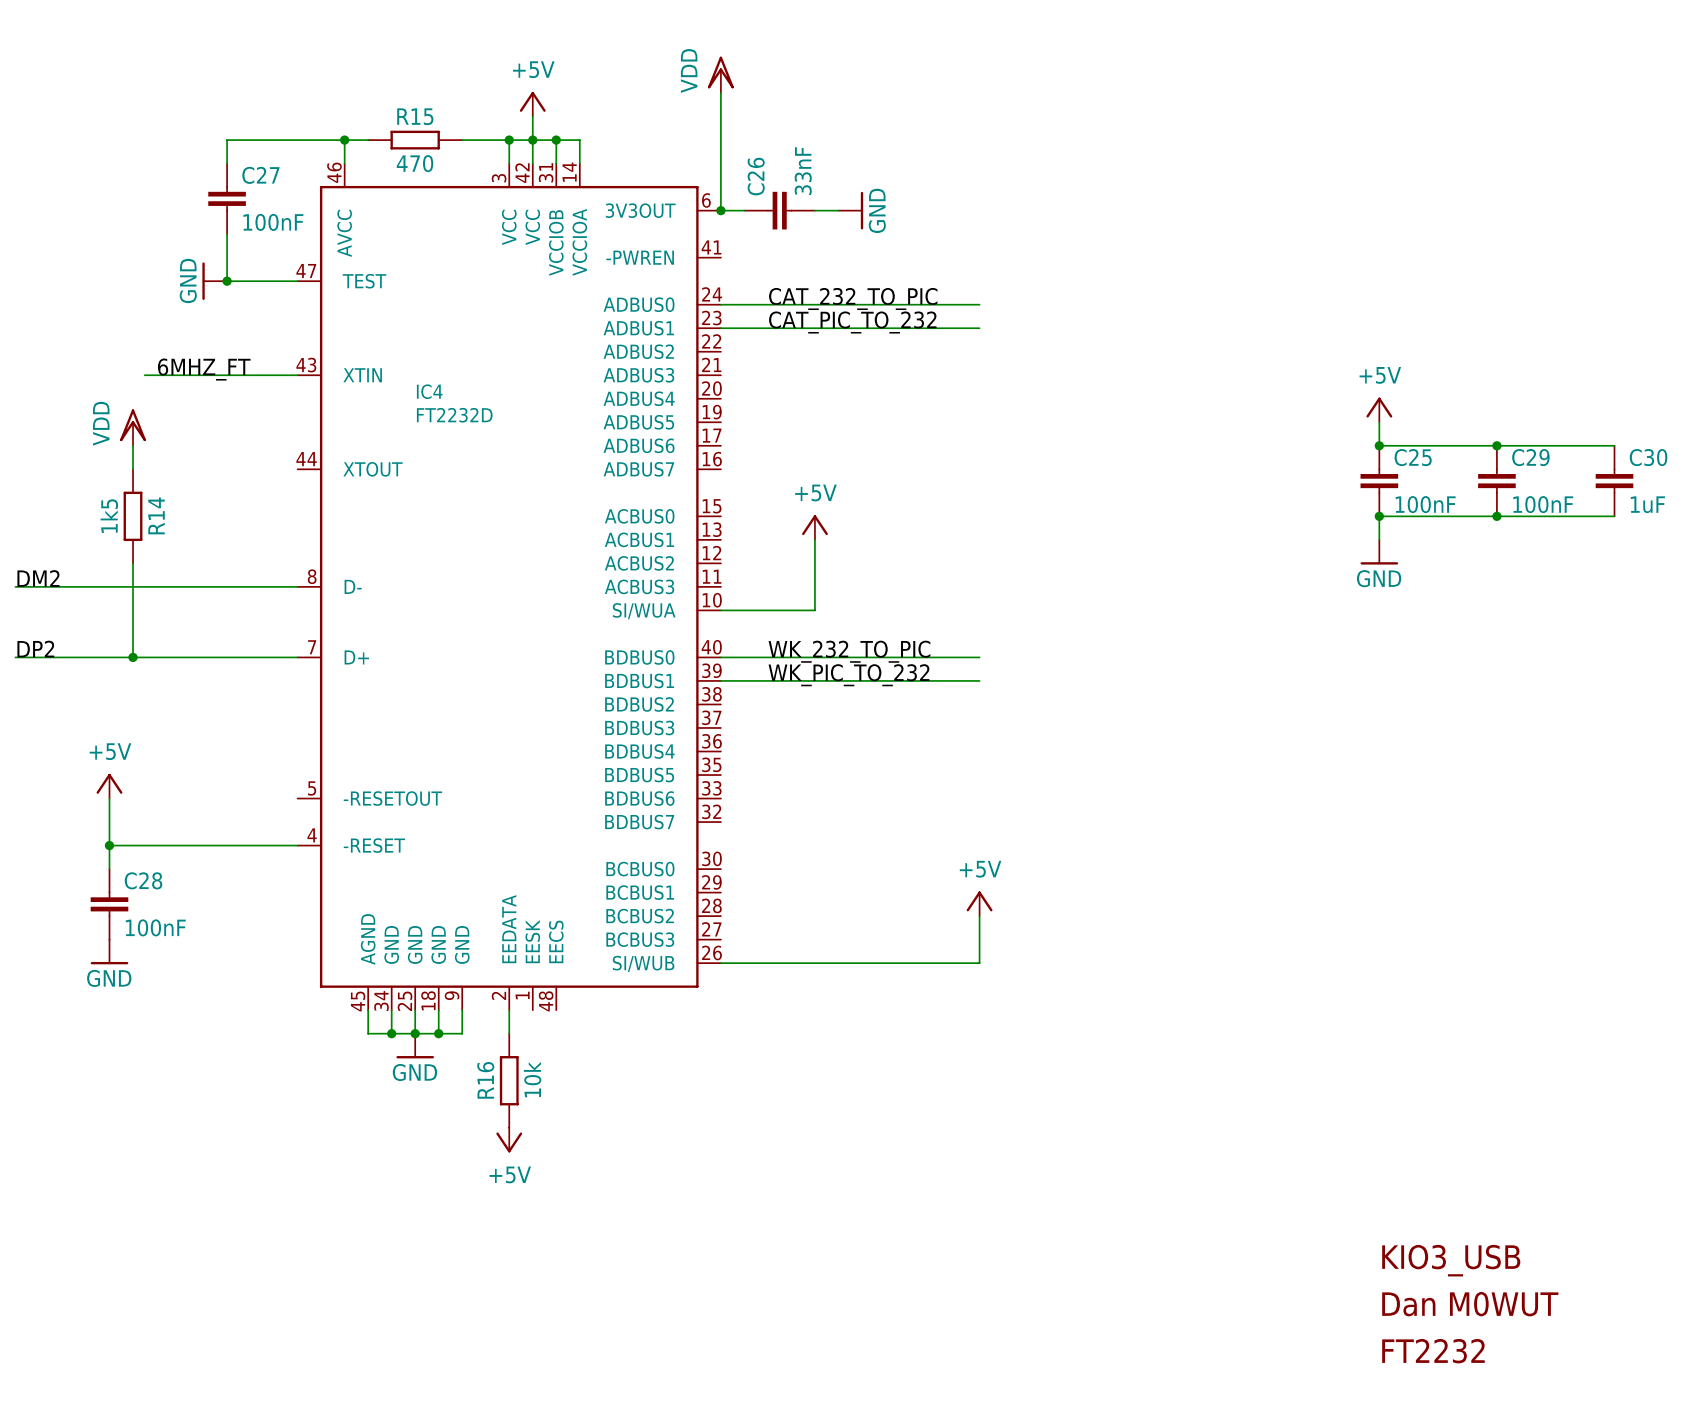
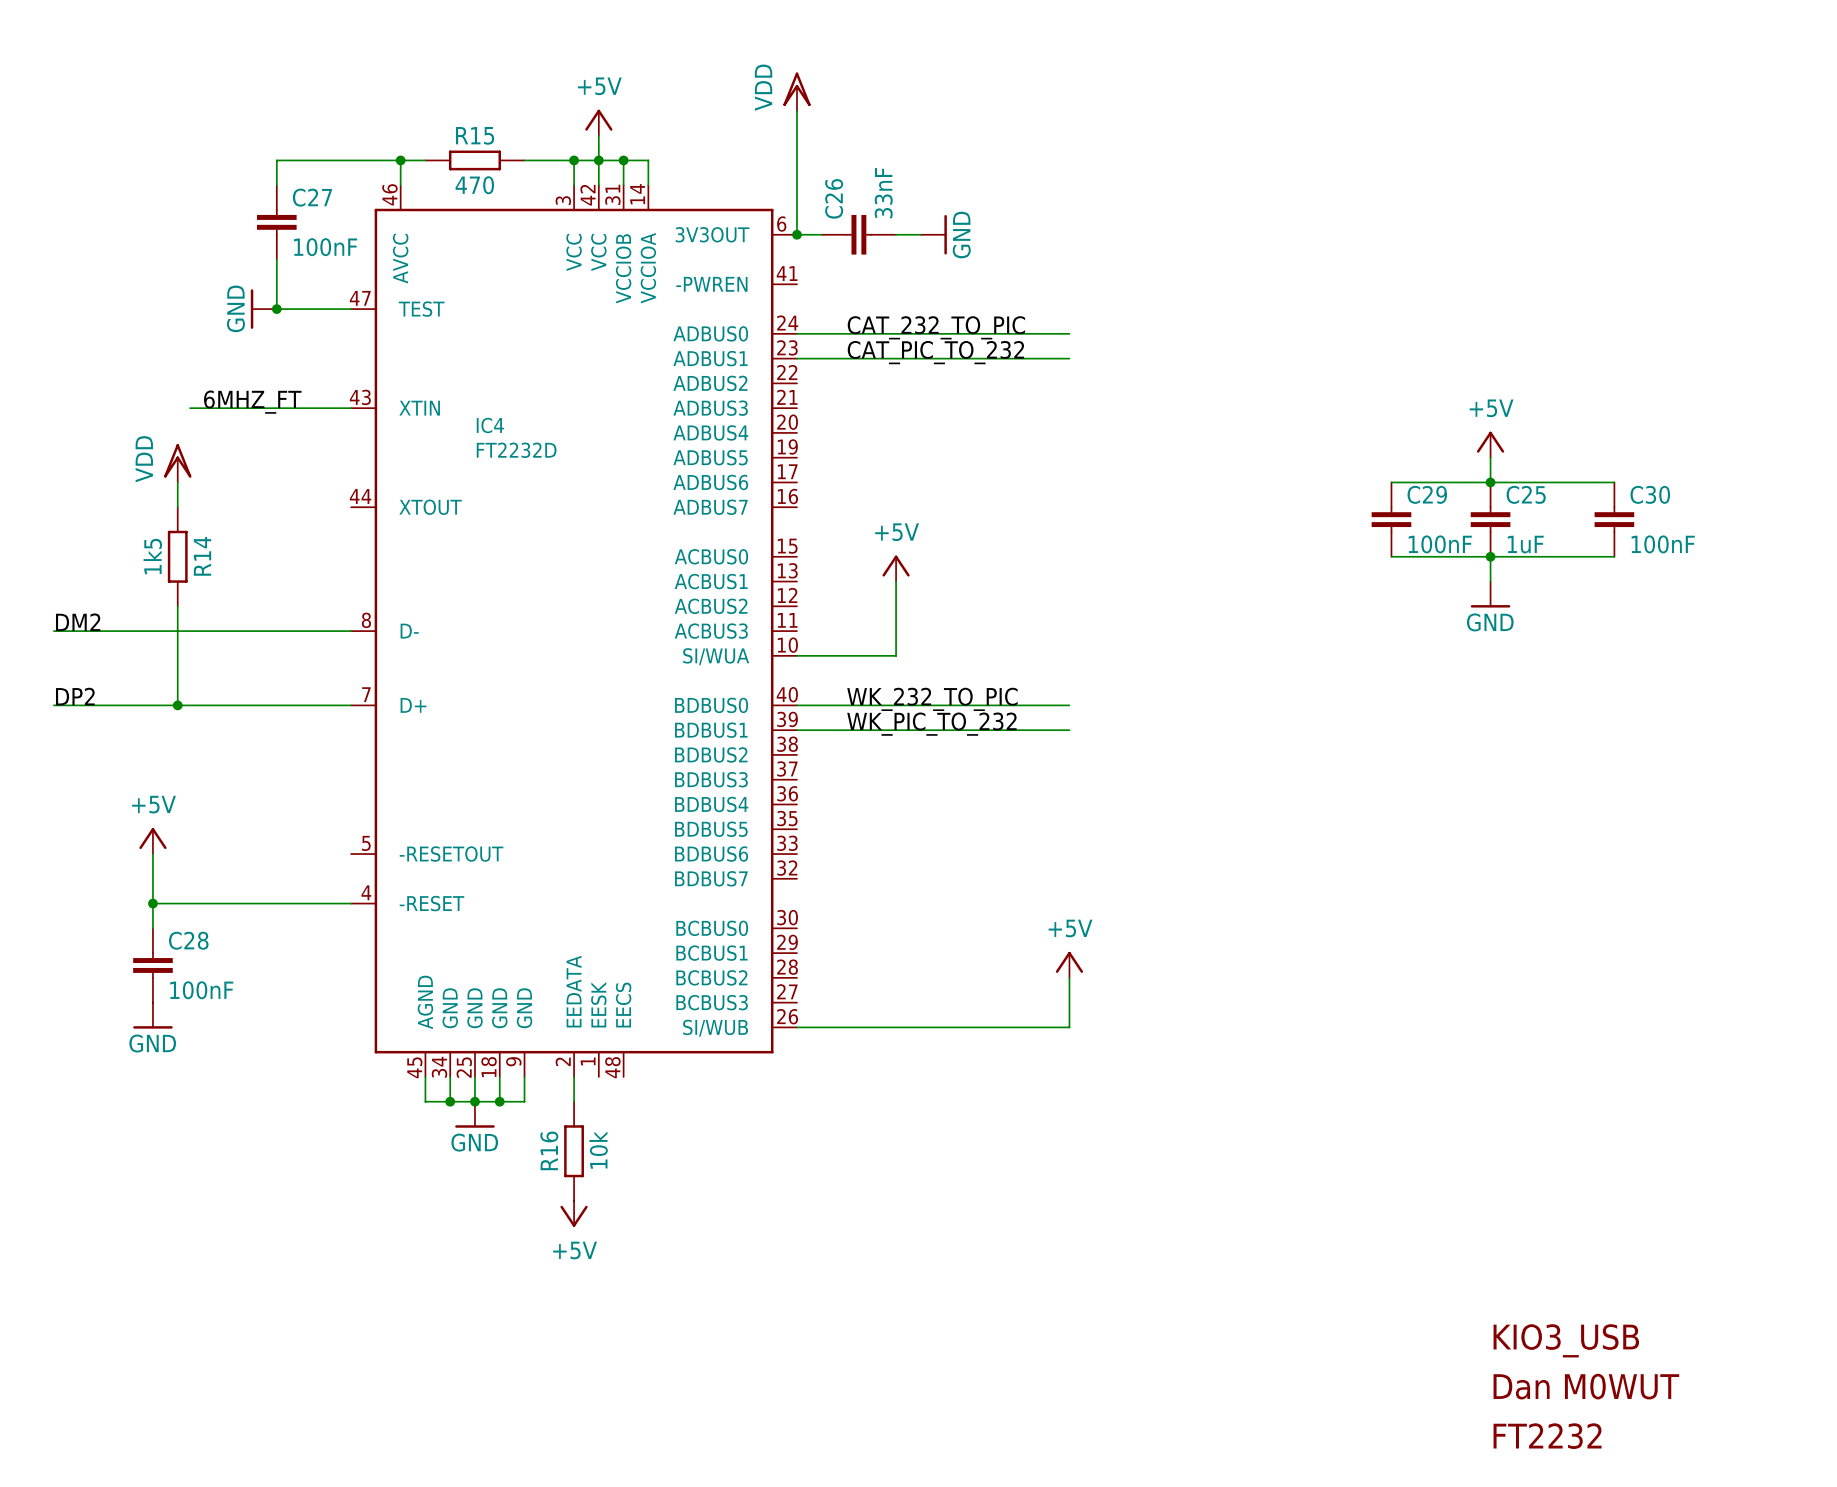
wire: none -> (1391, 482) (1490, 482)
wire: (1496, 445) (1614, 445) -> none
junction: (1496, 445) -> none
C29 name: C29 (1530, 457) -> C30 (1650, 494)
C29: none -> 100nF (1391, 519)
C30: 1uF (1614, 481) -> none
C25 value: 100nF (1425, 504) -> 1uF (1525, 544)
wire: none -> (1391, 556) (1490, 556)
wire: (1496, 516) (1614, 516) -> none
junction: (1496, 516) -> none

